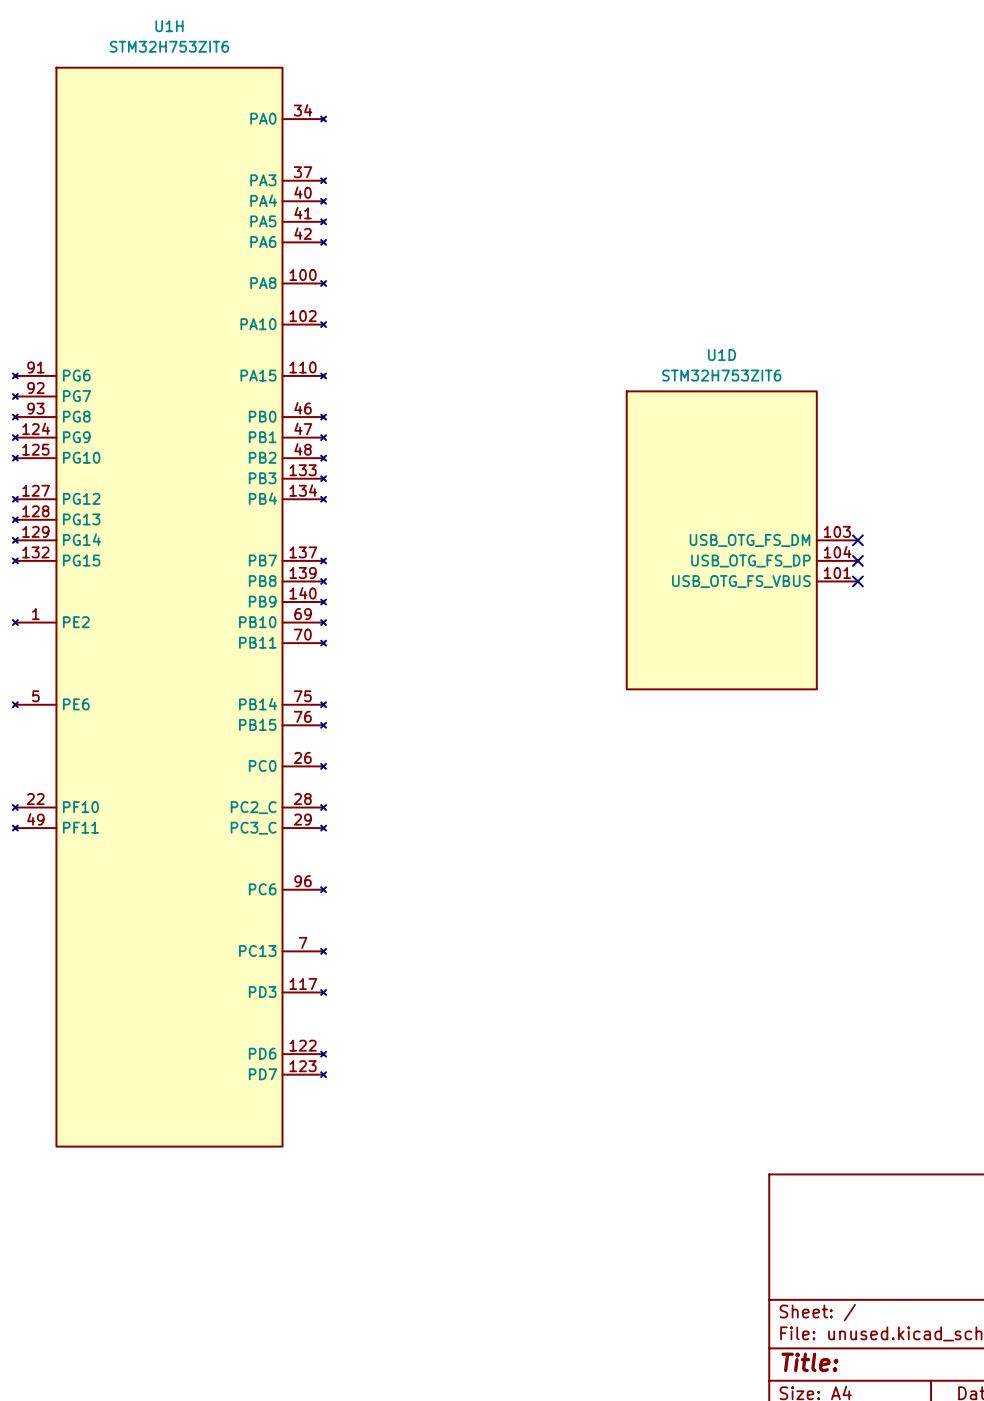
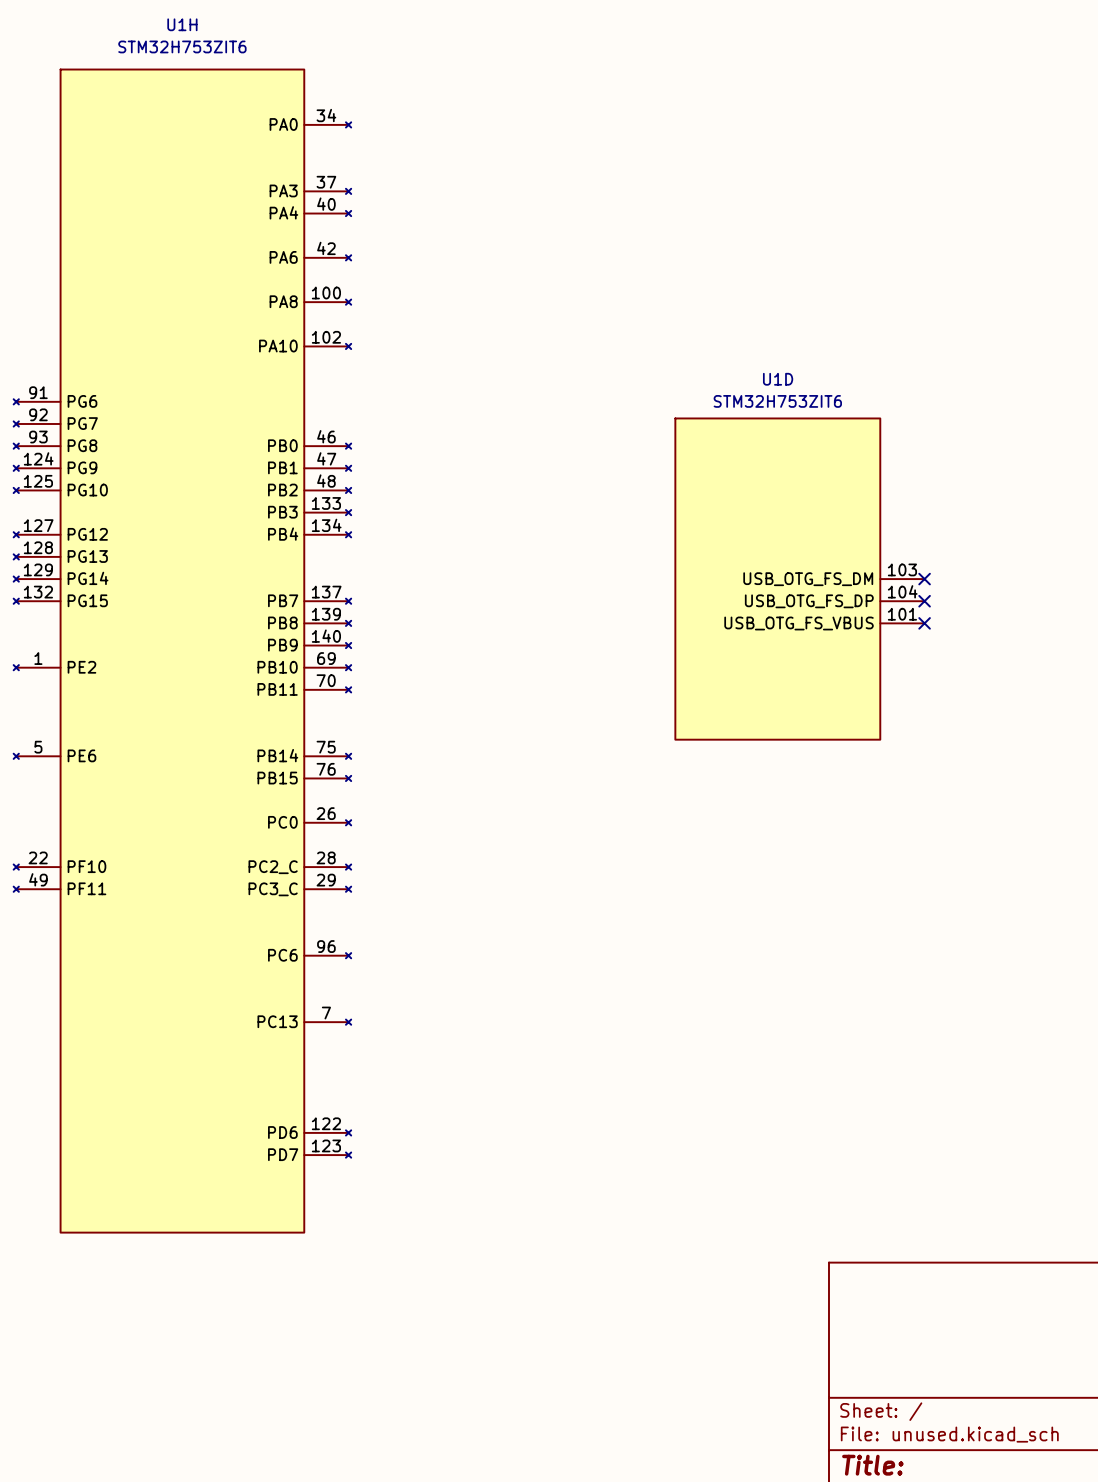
U1H symbol: [12, 67, 327, 1147] -> [13, 69, 352, 1233]

